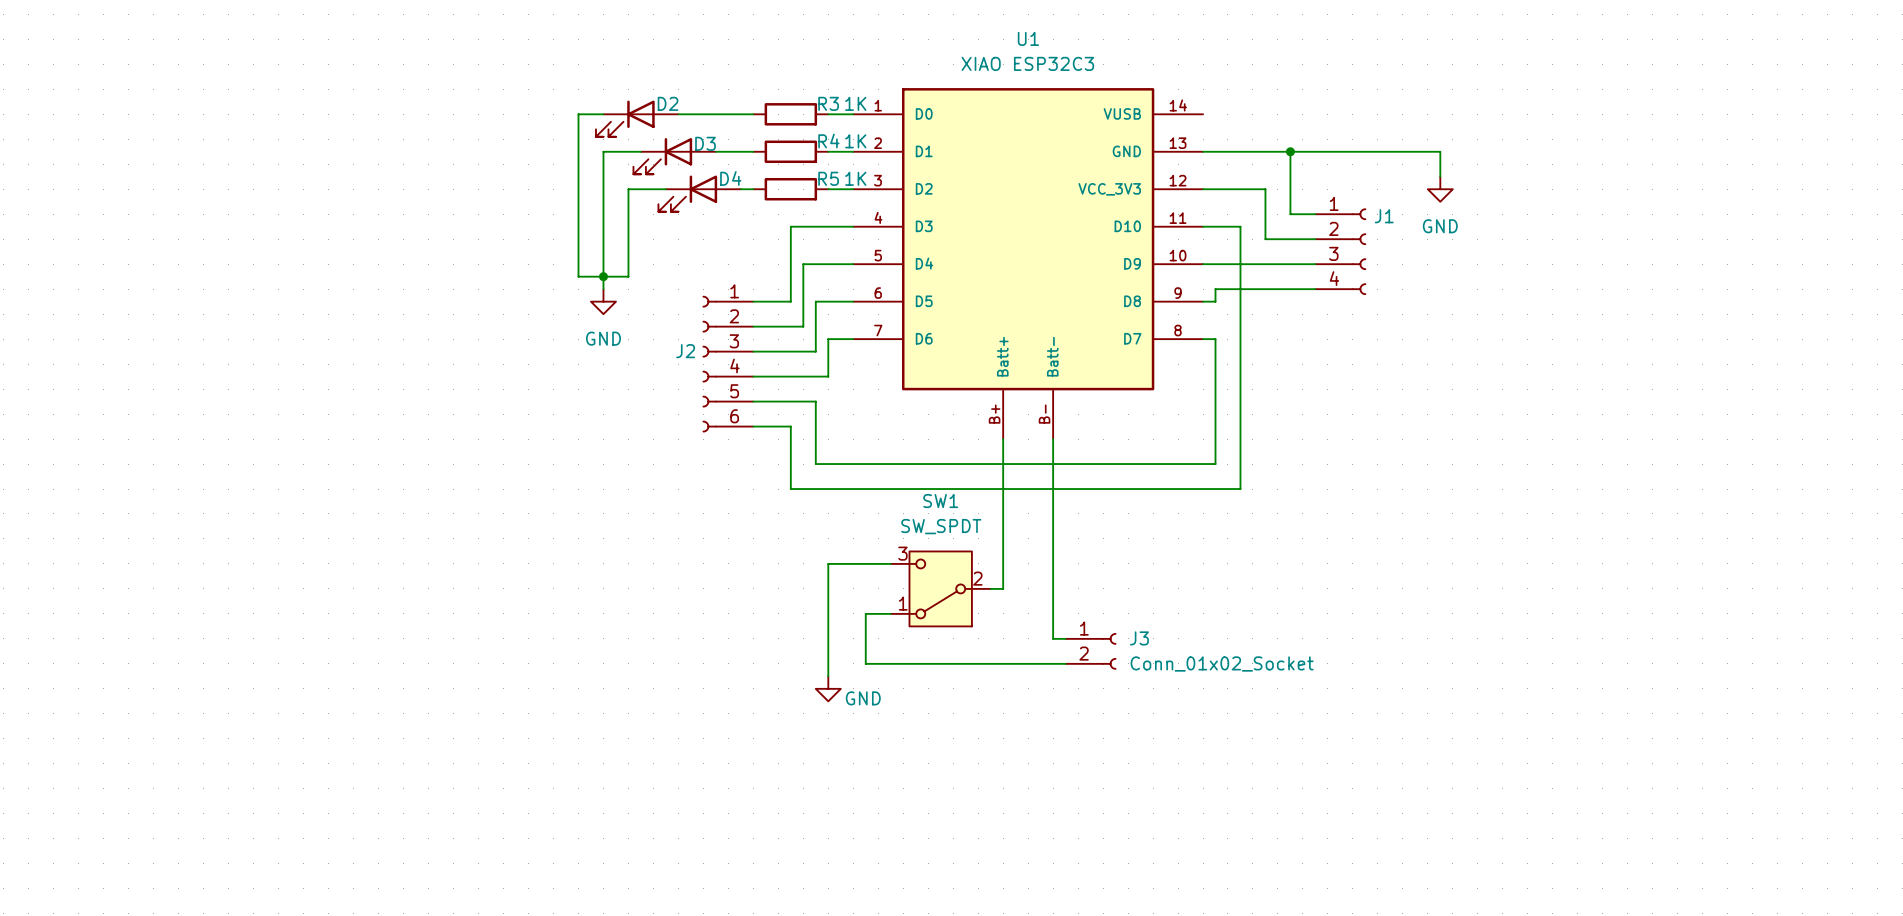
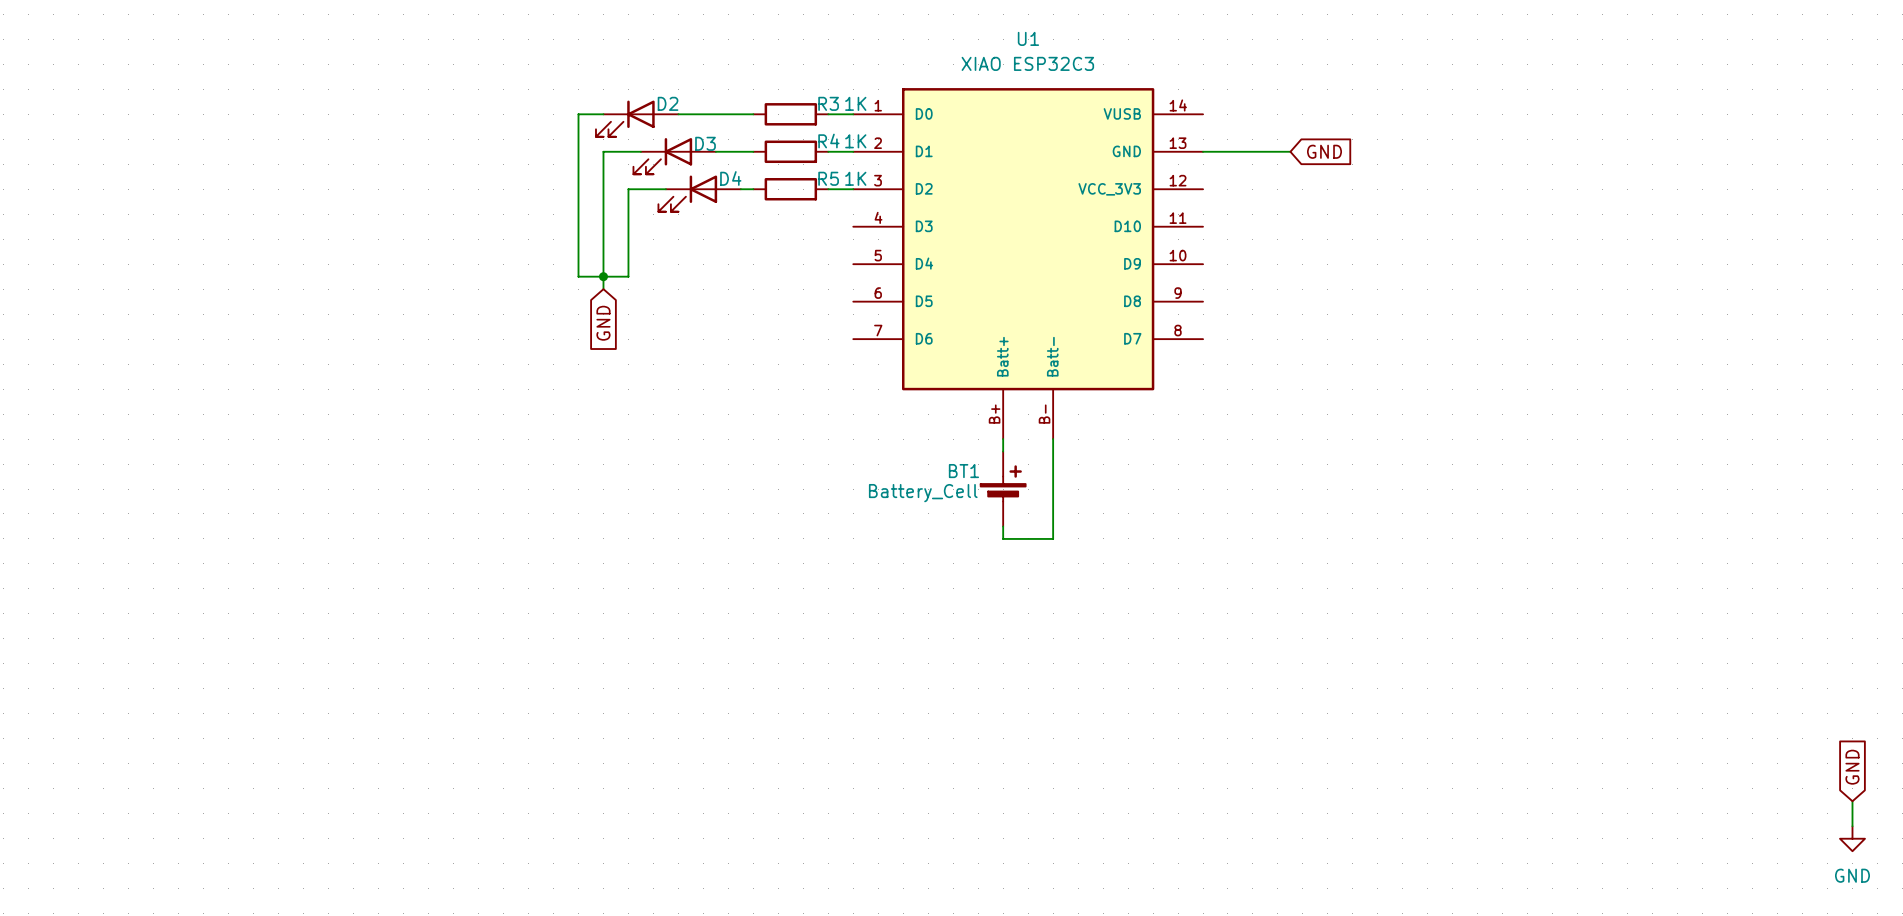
junction: (1290, 151) -> none
global label: none -> GND (1324, 151)
wire: (1440, 176) (1440, 151) (1290, 151) (1290, 214) (1315, 214) -> none
wire: (1203, 189) (1265, 189) (1265, 239) (1315, 239) -> none
power symbol: GND (1440, 189) -> none
wire: (853, 226) (790, 226) (790, 301) (753, 301) -> none
wire: (1203, 226) (1240, 226) (1240, 489) (790, 489) (790, 426) (753, 426) -> none
J1: (1340, 251) -> none
wire: (853, 264) (803, 264) (803, 326) (753, 326) -> none
wire: (1203, 264) (1315, 264) -> none
wire: (1315, 289) (1215, 289) (1215, 301) (1203, 301) -> none
power symbol: GND (603, 301) -> none
wire: (853, 301) (815, 301) (815, 351) (753, 351) -> none
global label: none -> GND (603, 323)
wire: (853, 339) (828, 339) (828, 376) (753, 376) -> none
wire: (1203, 339) (1215, 339) (1215, 464) (815, 464) (815, 401) (753, 401) -> none
J2: (728, 364) -> none
BT1: none -> Battery_Cell (1003, 489)
wire: (1003, 538) (1003, 588) (990, 588) -> (1003, 538) (1053, 538)
wire: (1053, 538) (1053, 638) (1065, 638) -> none
wire: (890, 563) (828, 563) (828, 676) -> none
SW1: SW_SPDT (940, 588) -> none
wire: (890, 613) (865, 613) (865, 663) (1065, 663) -> none
J3: Conn_01x02_Socket (1090, 651) -> none
power symbol: GND (828, 688) -> none
global label: none -> GND (1852, 767)
wire: none -> (1852, 801) (1852, 826)
power symbol: none -> GND (1852, 838)

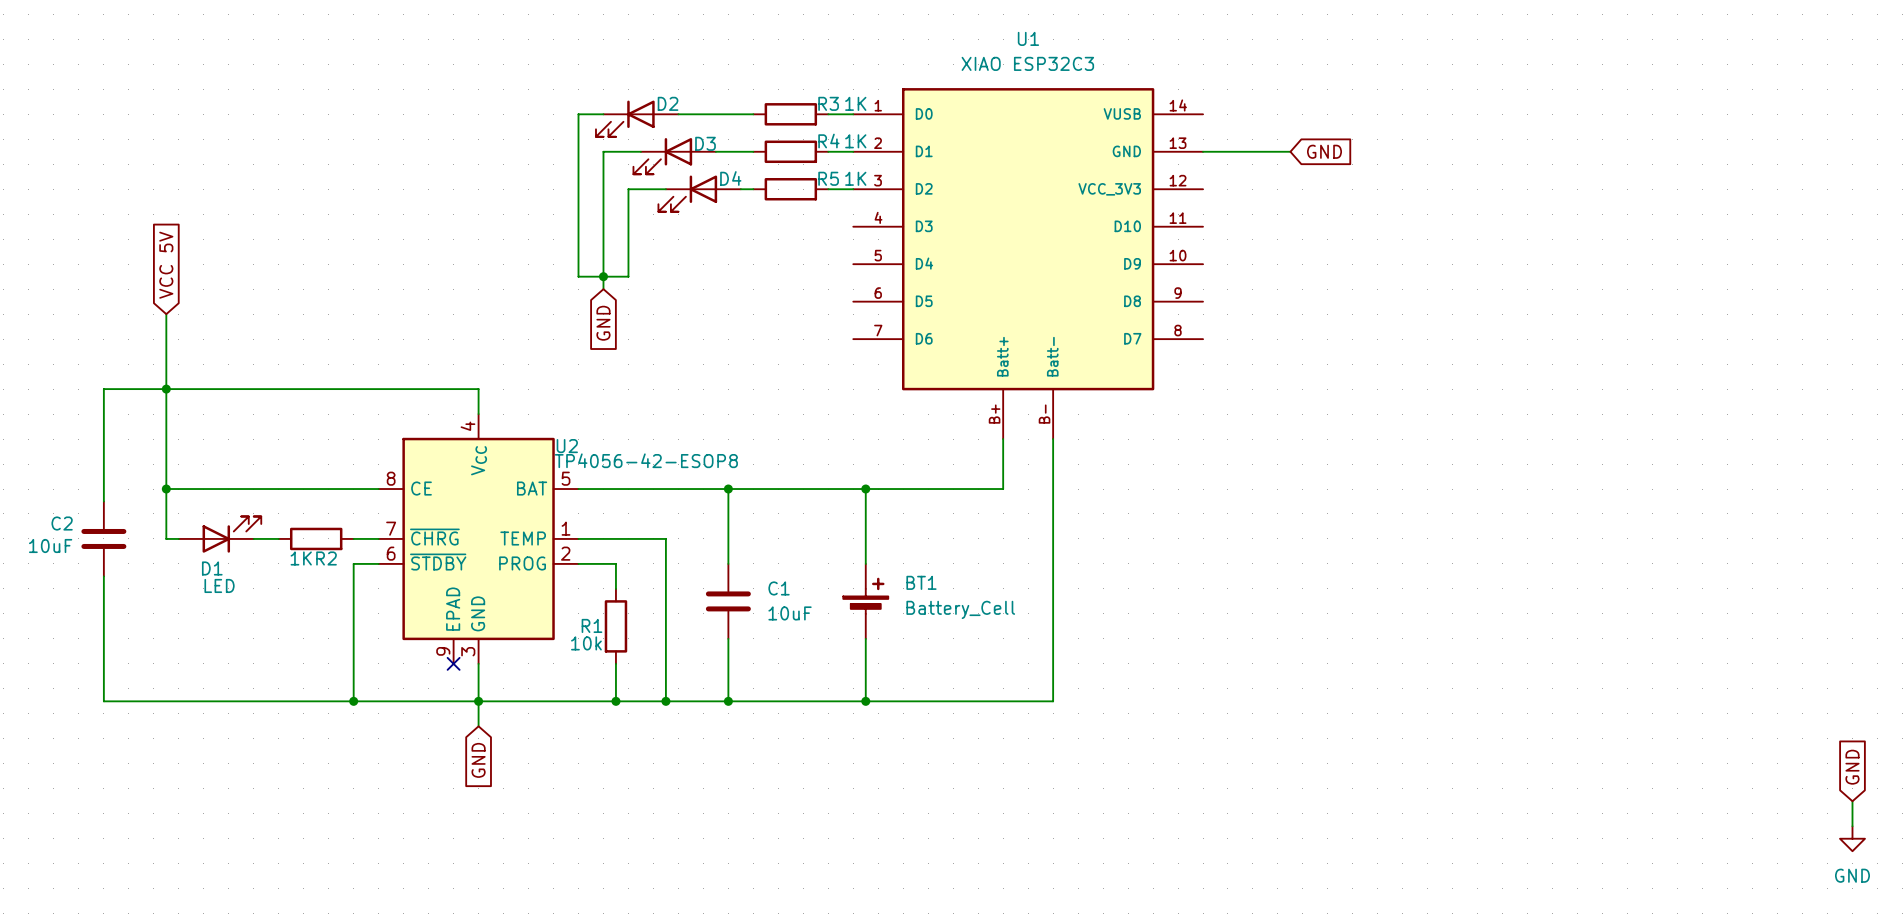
global label: none -> VCC 5V (166, 265)
wire: none -> (166, 314) (166, 538) (178, 538)
junction: none -> (166, 389)
wire: none -> (478, 414) (478, 389) (103, 389) (103, 501)
wire: none -> (1003, 451) (1003, 489) (578, 489)
BT1 name position: BT1 (963, 471) -> BT1 (921, 582)
wire: none -> (166, 489) (378, 489)
junction: none -> (166, 489)
wire: none -> (728, 489) (728, 563)
junction: none -> (728, 489)
wire: none -> (865, 489) (865, 563)
junction: none -> (865, 489)
BT1 position: (1003, 489) -> (865, 601)
BT1 value position: Battery_Cell (923, 493) -> Battery_Cell (960, 609)
wire: (1003, 526) (1003, 538) (1053, 538) -> (103, 576) (103, 701) (1053, 701) (1053, 538)
D1: none -> LED (220, 534)
C2: none -> 10uF (103, 538)
wire: none -> (253, 538) (278, 538)
R2: none -> 1K (316, 538)
wire: none -> (353, 538) (378, 538)
U2: none -> TP4056-42-ESOP8 (478, 538)
wire: none -> (578, 538) (665, 538) (665, 701)
wire: none -> (378, 563) (353, 563) (353, 701)
wire: none -> (578, 563) (615, 563) (615, 588)
C1: none -> 10uF (728, 601)
R1: none -> 10k (615, 626)
wire: none -> (728, 638) (728, 701)
wire: none -> (865, 638) (865, 701)
no-connect mark: none -> (453, 663)
wire: none -> (478, 663) (478, 726)
wire: none -> (615, 663) (615, 701)
junction: none -> (353, 701)
junction: none -> (478, 701)
junction: none -> (615, 701)
junction: none -> (665, 701)
junction: none -> (728, 701)
junction: none -> (865, 701)
global label: none -> GND (478, 760)

